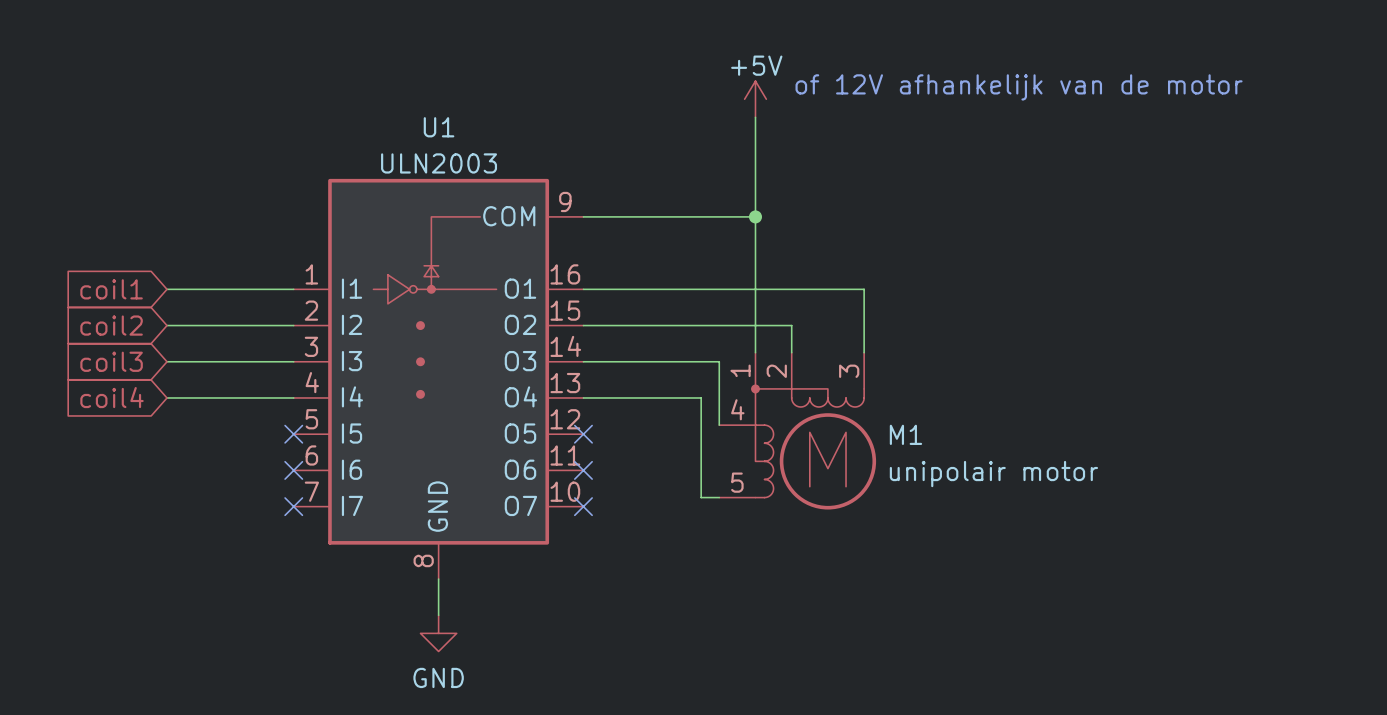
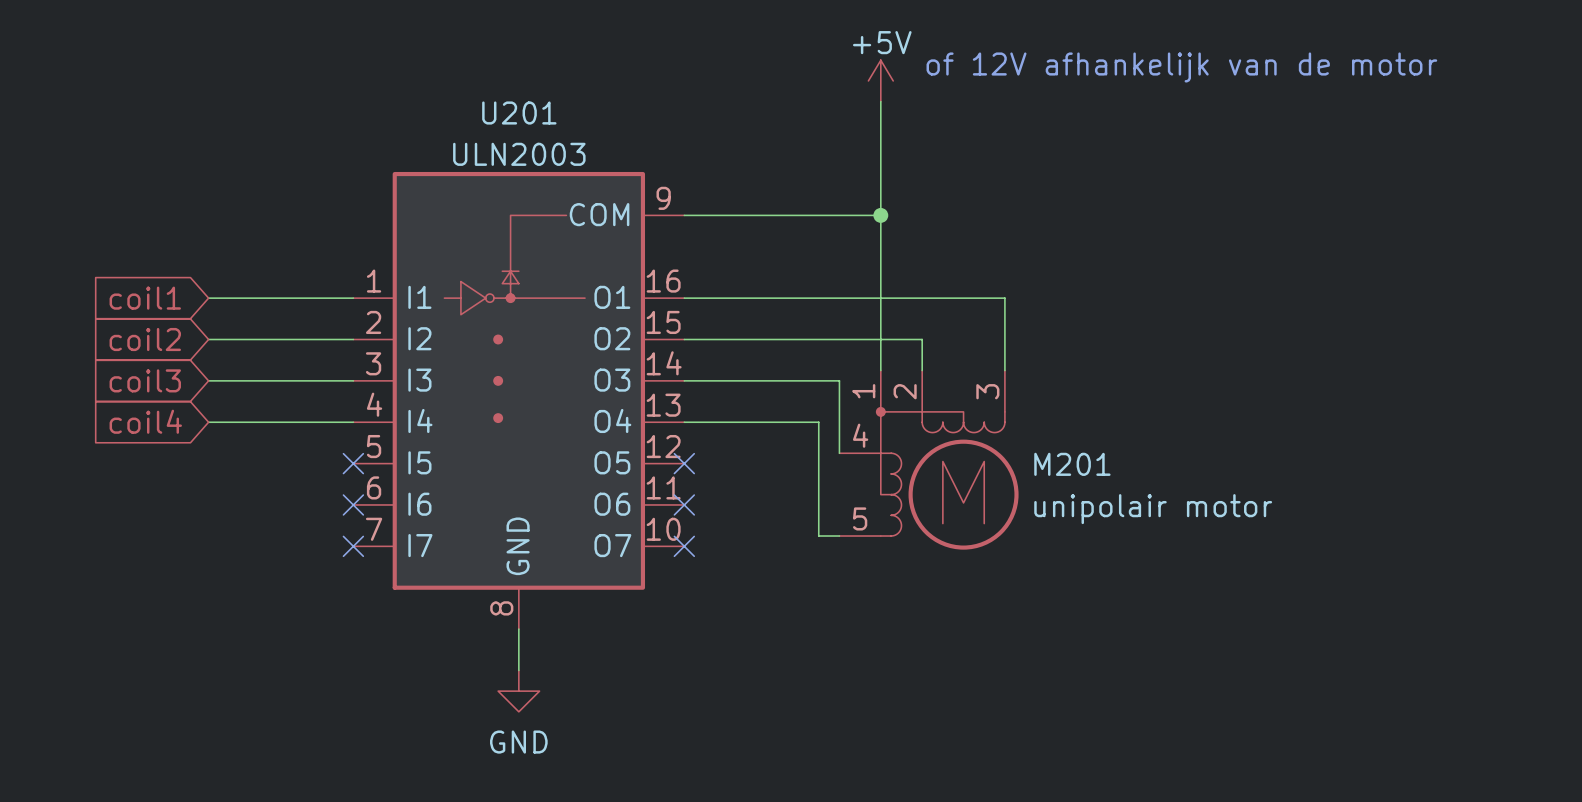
U1 name: U1 (439, 127) -> U201 (519, 113)
M1 name: M1 (905, 434) -> M201 (1072, 464)

